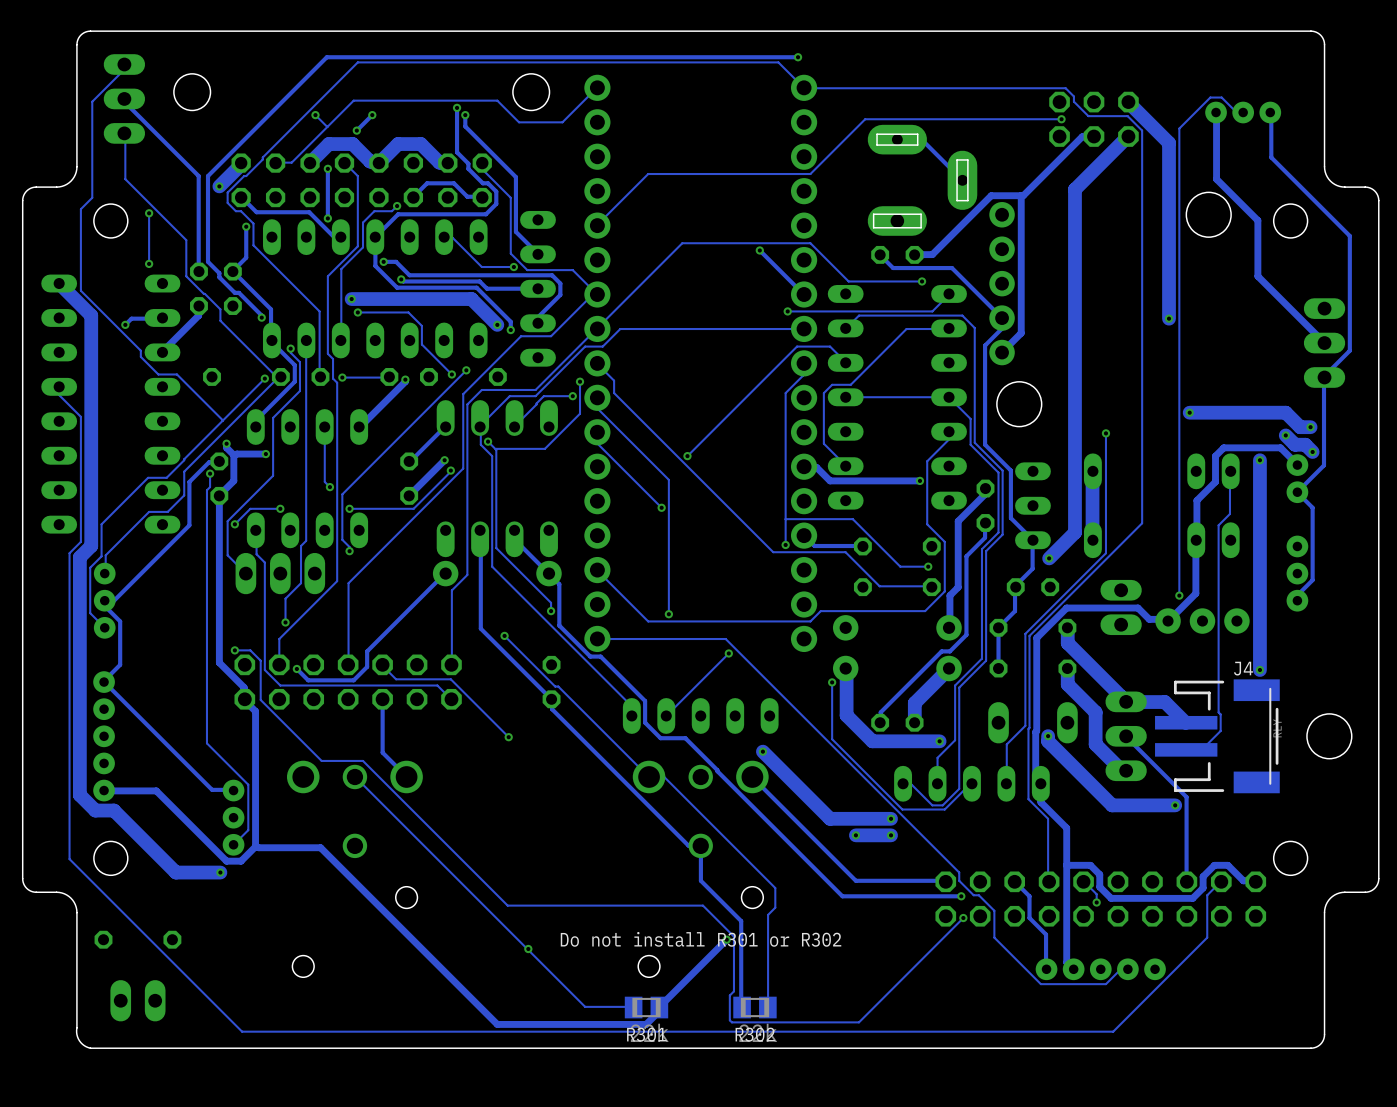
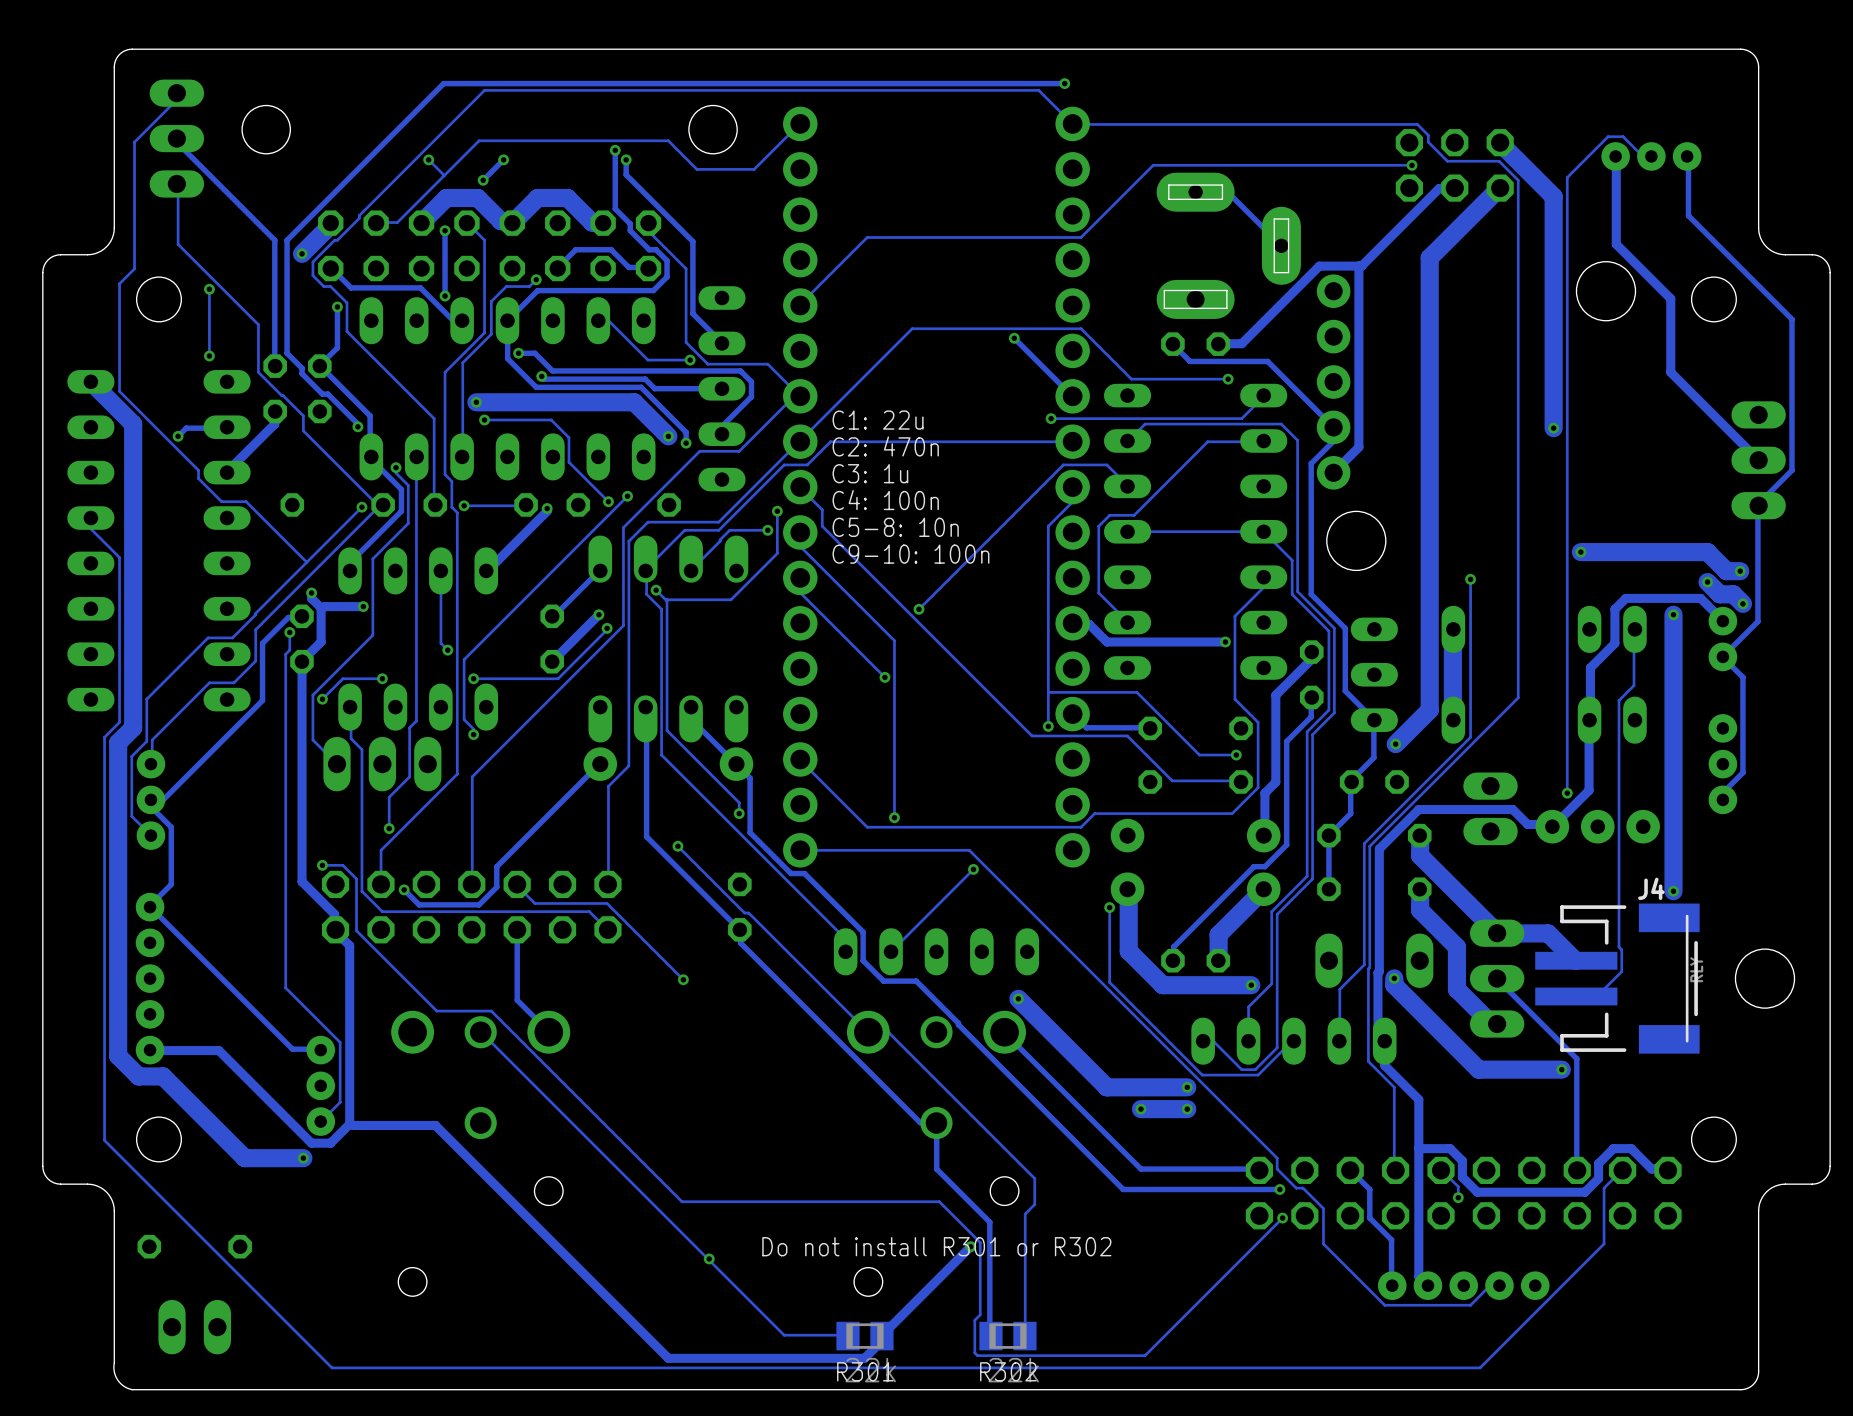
text: none -> C1: 22u (878, 420)
text: none -> C2: 470n (885, 446)
text: none -> C3: 1u (870, 473)
text: none -> C4: 100n (885, 500)
text: none -> C5-8: 10n (895, 527)
text: none -> C9-10: 100n (910, 554)

